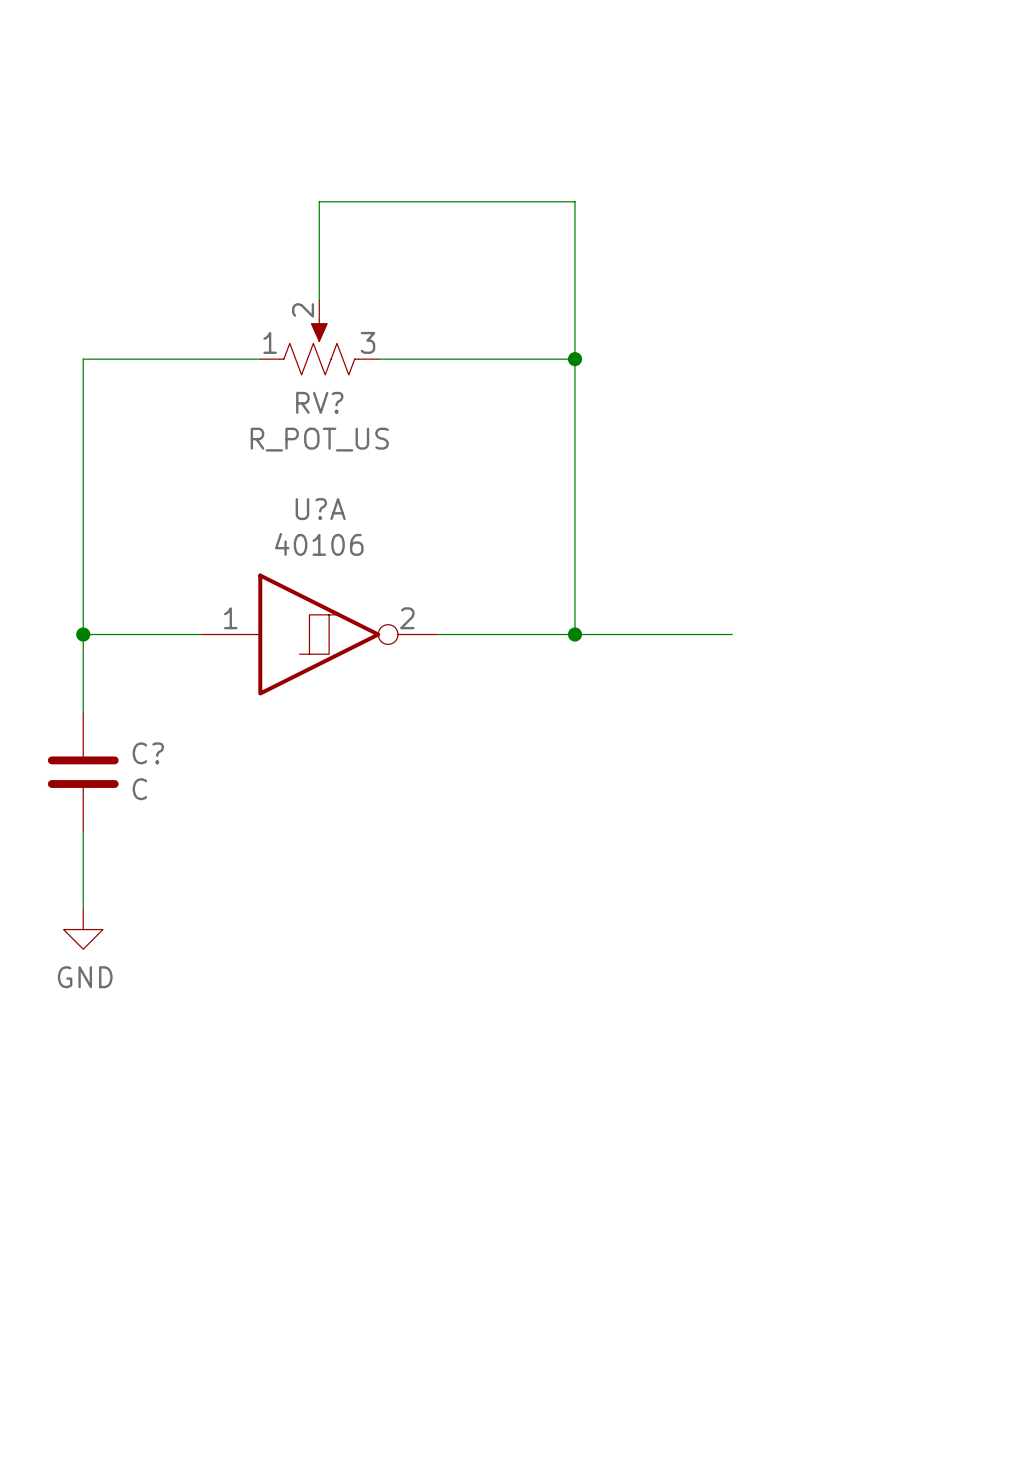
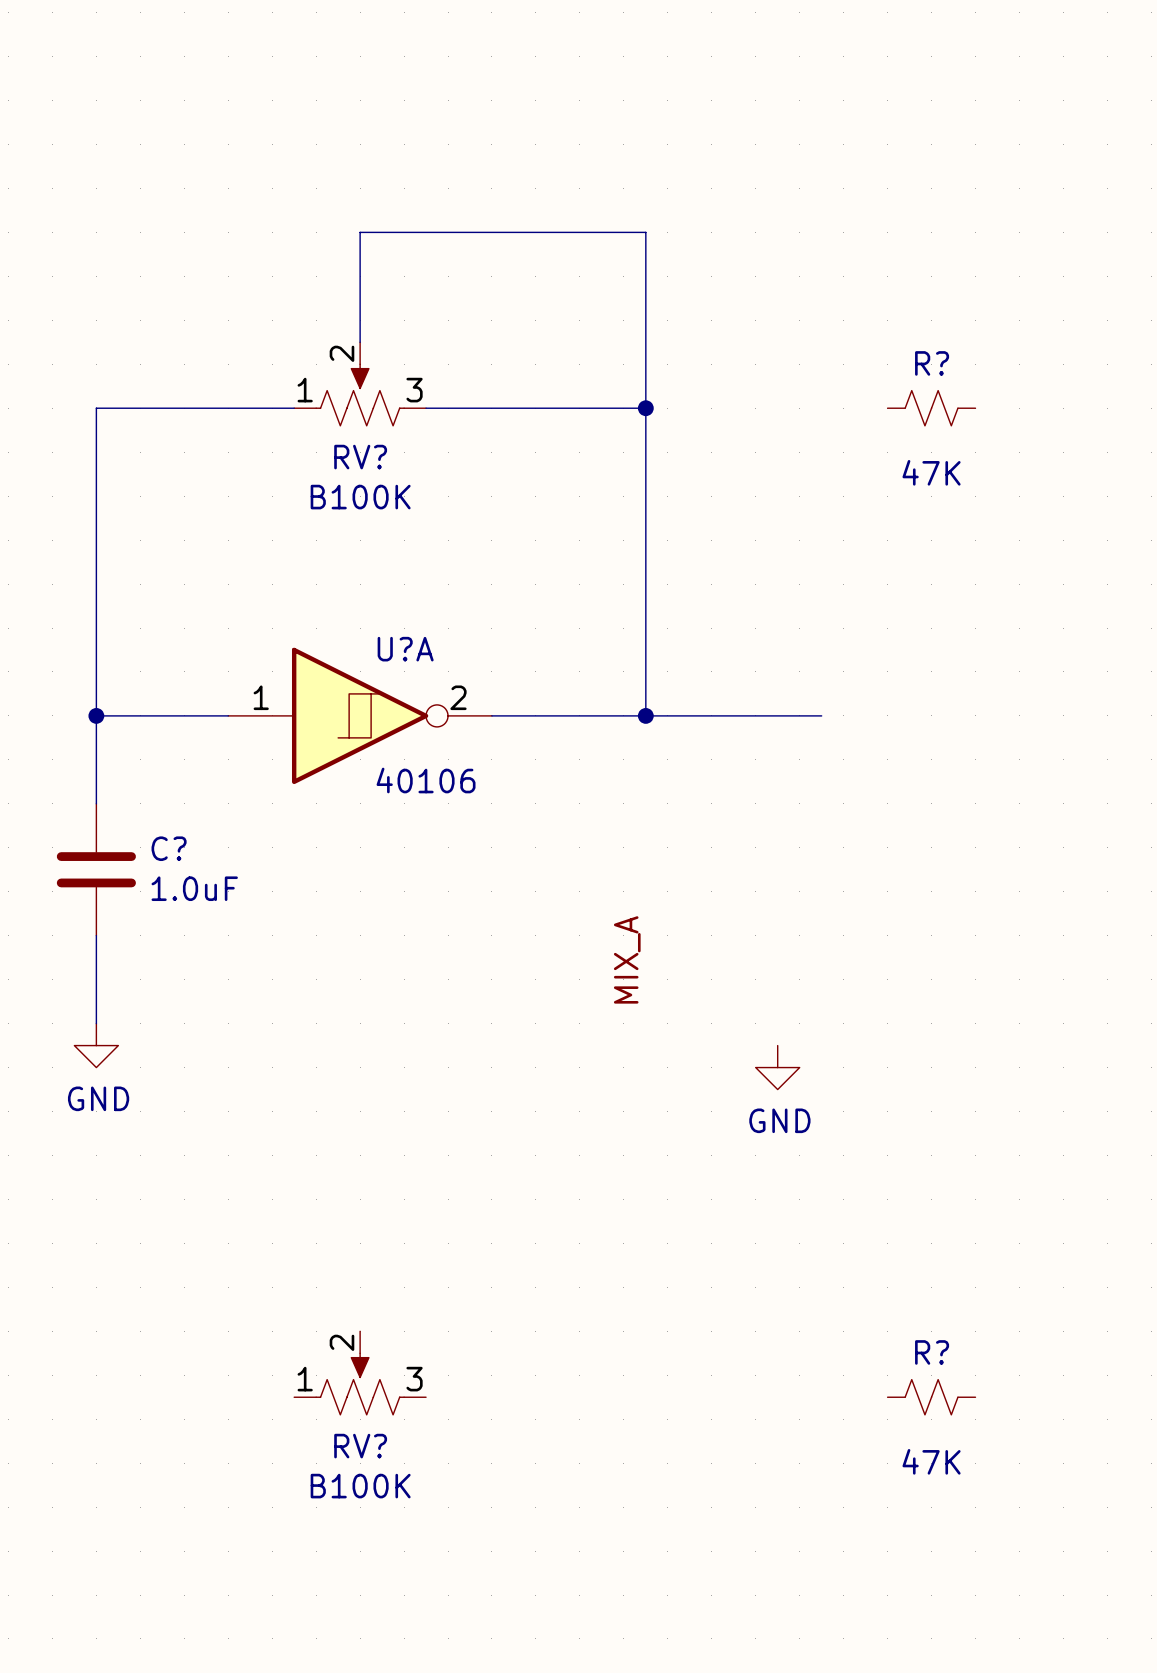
R?: none -> 47K (931, 408)
RV? value: R_POT_US (319, 439) -> B100K (360, 497)
U?A name position: U?A (320, 509) -> U?A (405, 649)
U?A value position: 40106 (319, 544) -> 40106 (426, 780)
C? value: C (139, 789) -> 1.0uF (194, 888)
label: none -> MIX_A (627, 959)
power symbol: none -> GND (777, 1067)
RV?: none -> B100K (360, 1373)
R?: none -> 47K (931, 1397)

